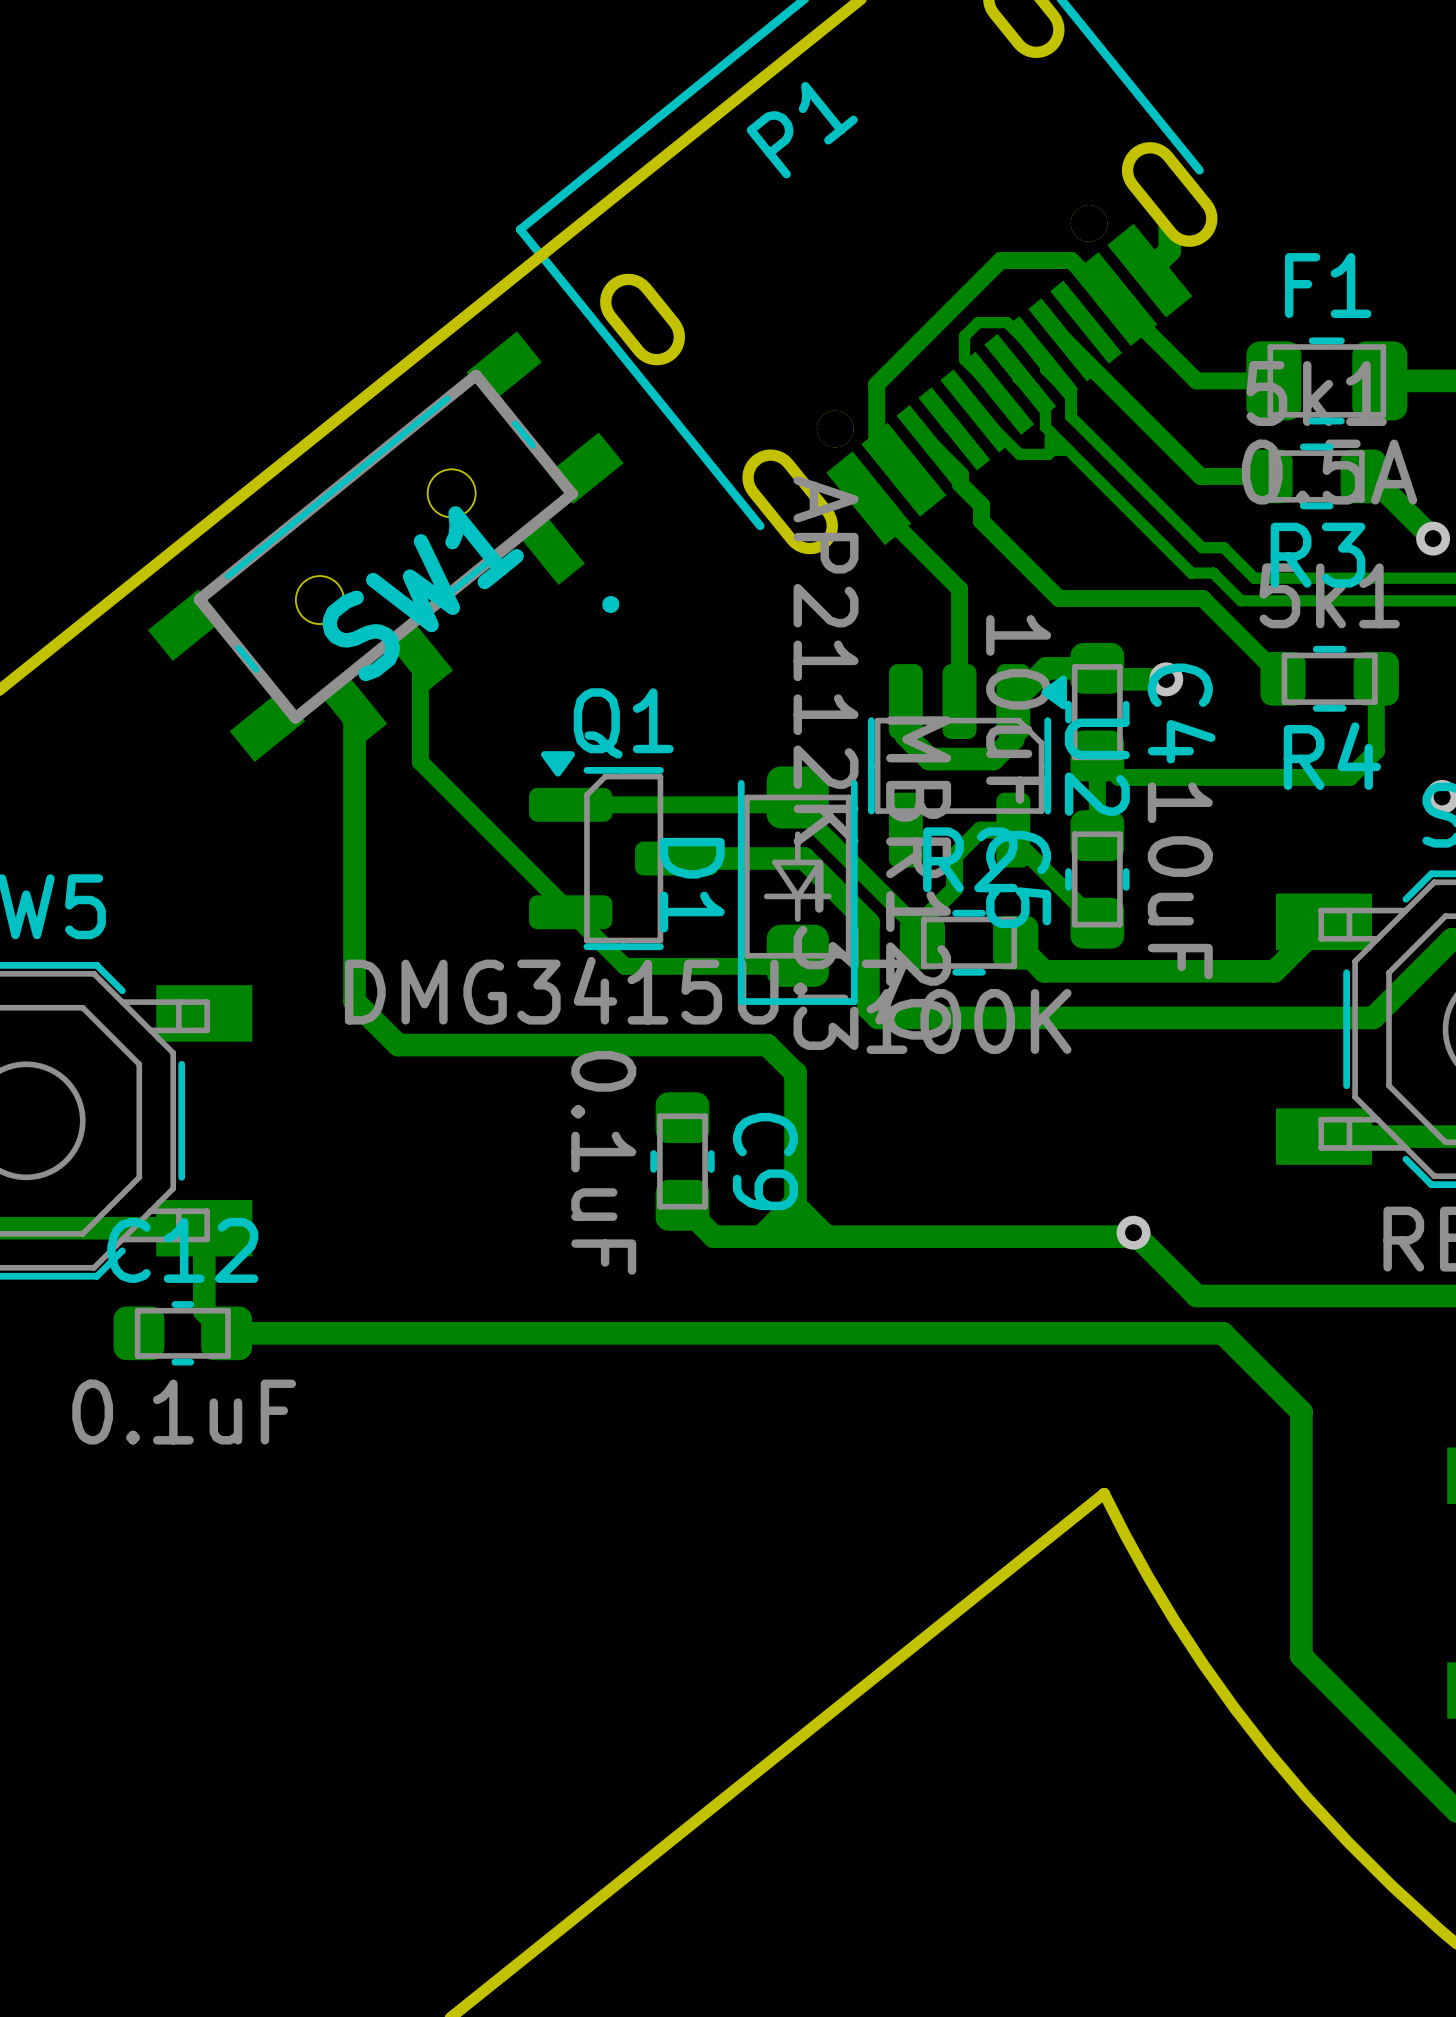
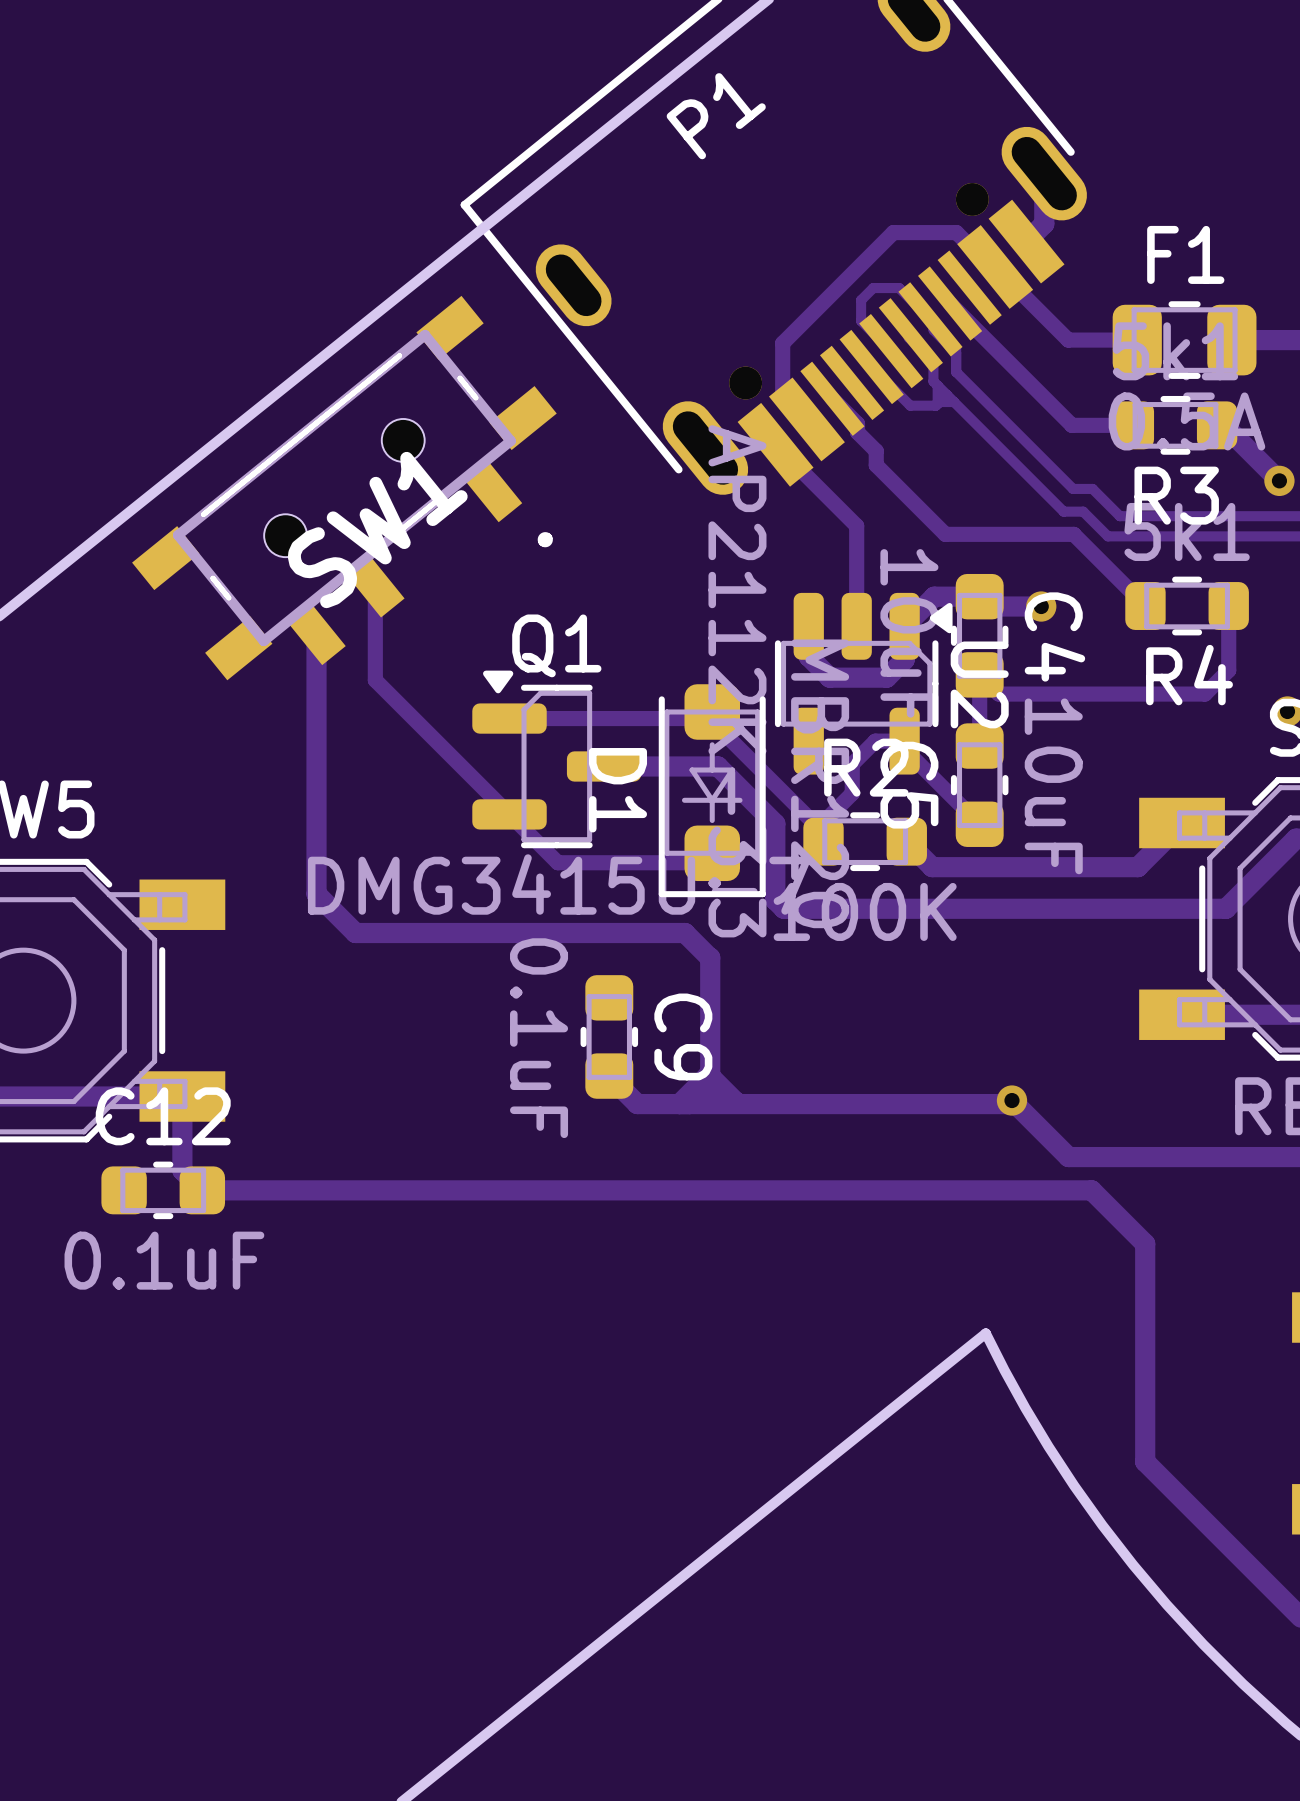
track: (1282, 1393) (1301, 1411) (1301, 1656) -> (1145, 1243) (1145, 1461) (1161, 1478)

